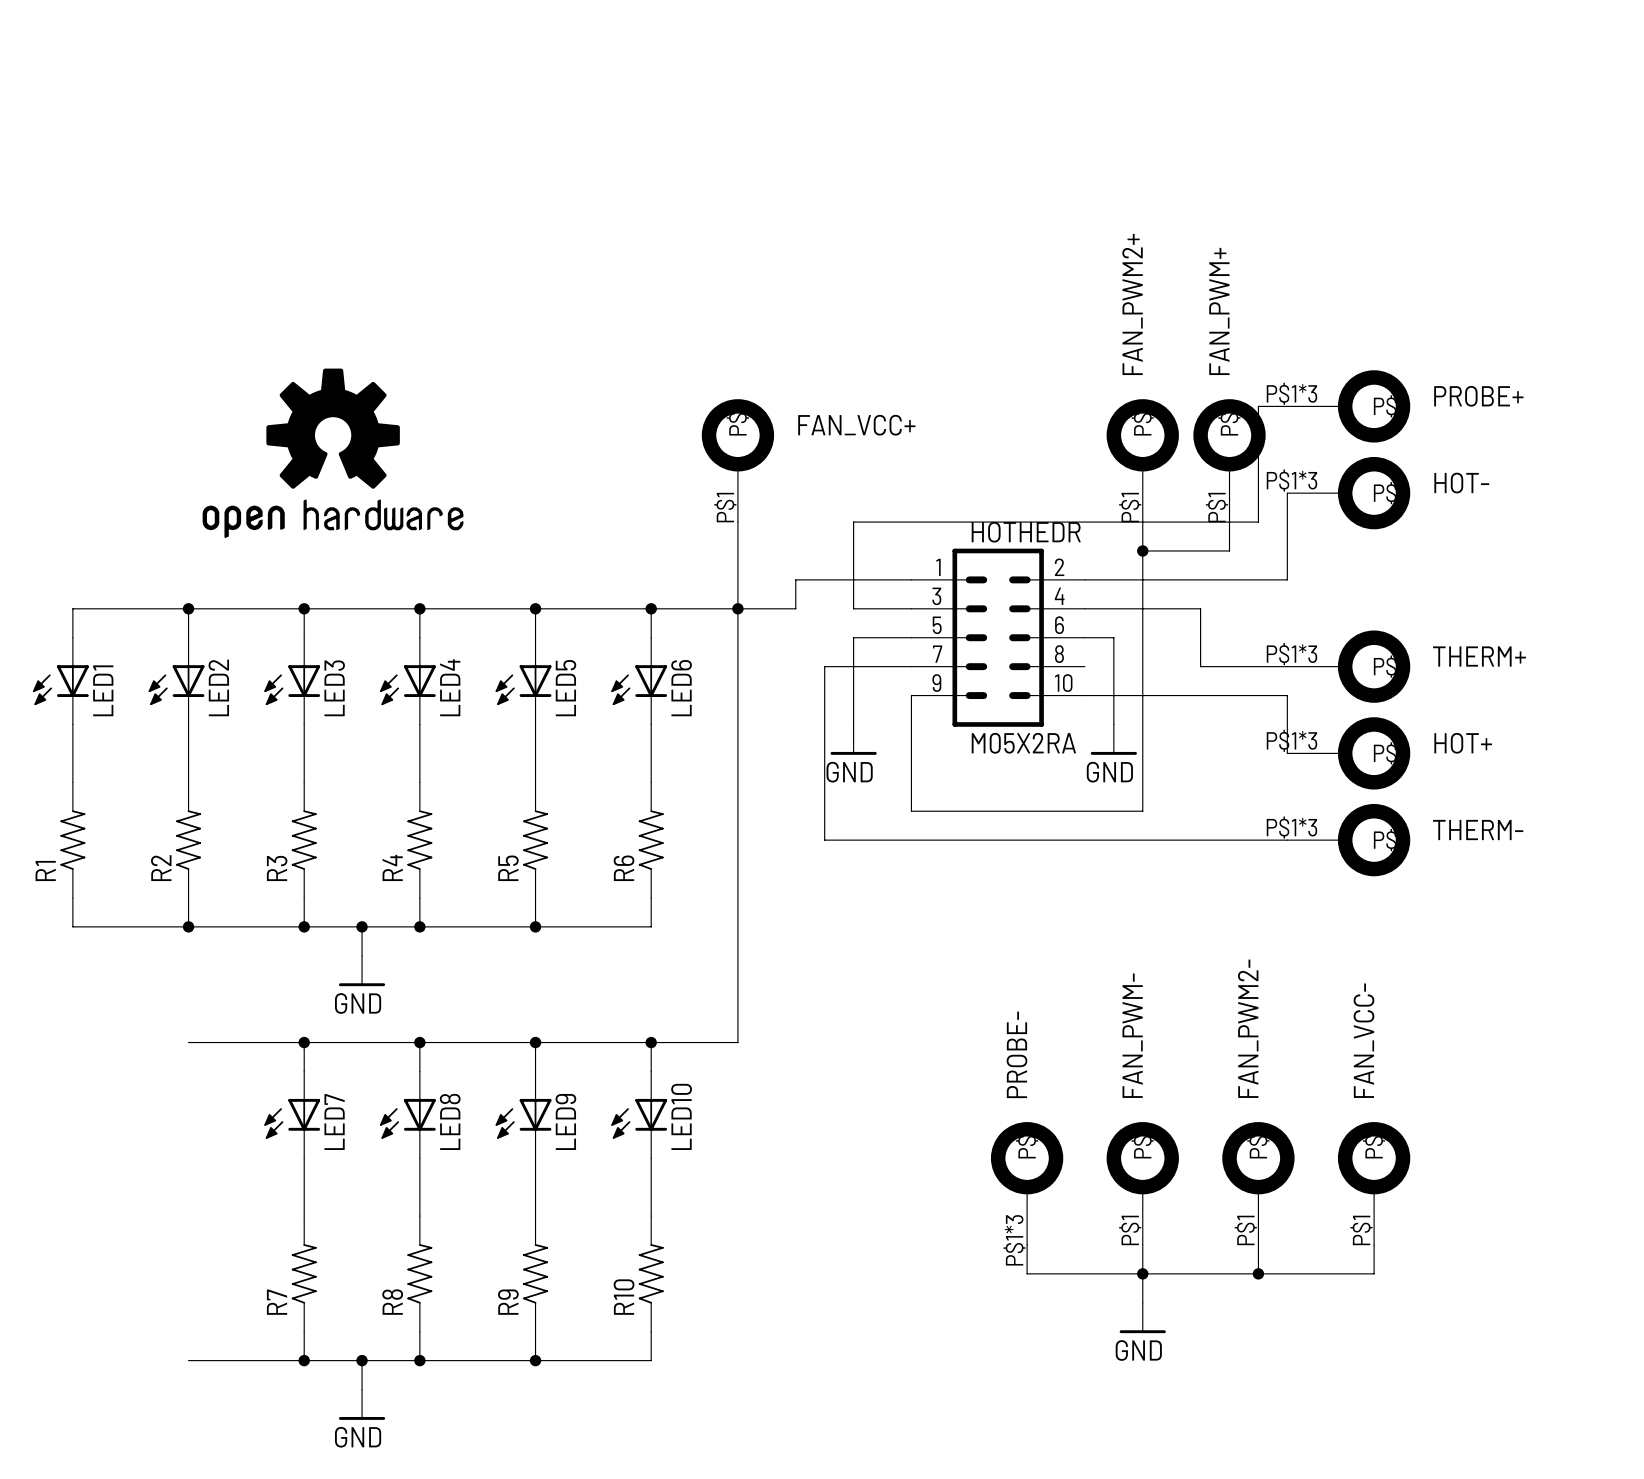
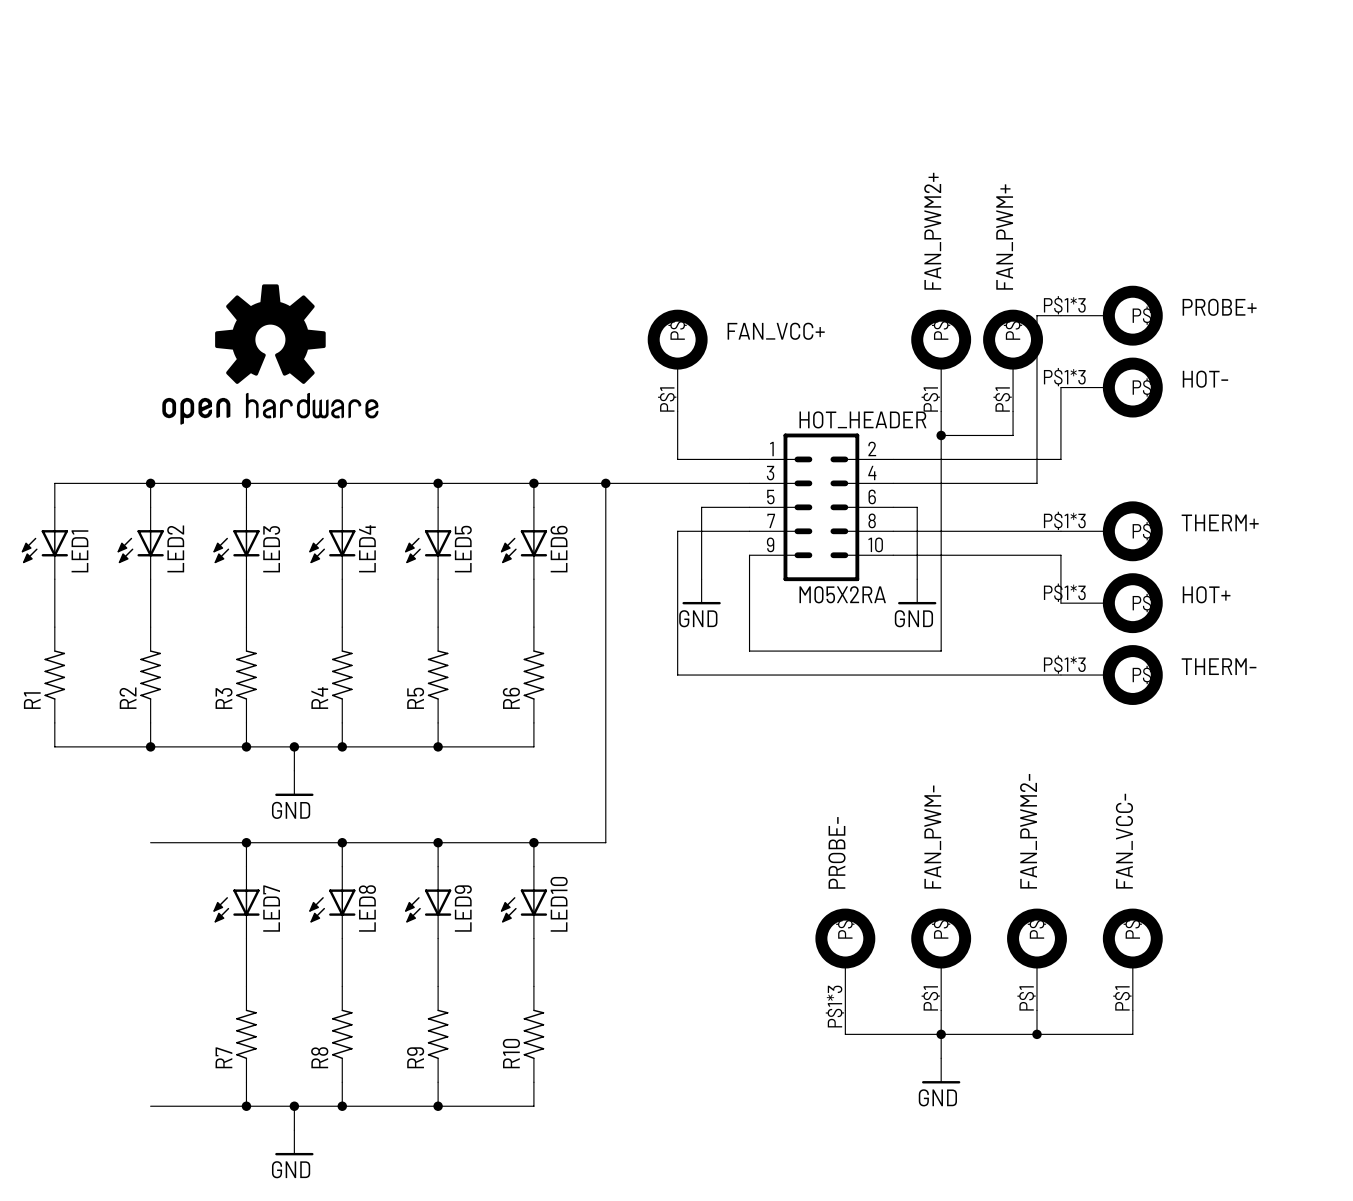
FAN_VCC+ position: (737, 460) -> (677, 360)
wire: (737, 522) (737, 608) -> none
wire: none -> (677, 411) (677, 459)
wire: (1258, 522) (853, 522) (853, 608) -> (1036, 411) (1036, 483) (989, 483)
HOTHEDR name: HOTHEDR (1026, 532) -> HOT_HEADER (862, 419)
wire: (824, 579) (795, 579) (795, 608) -> (701, 483) (653, 483)
wire: (1200, 608) (1200, 666) -> (893, 531) (989, 531)

